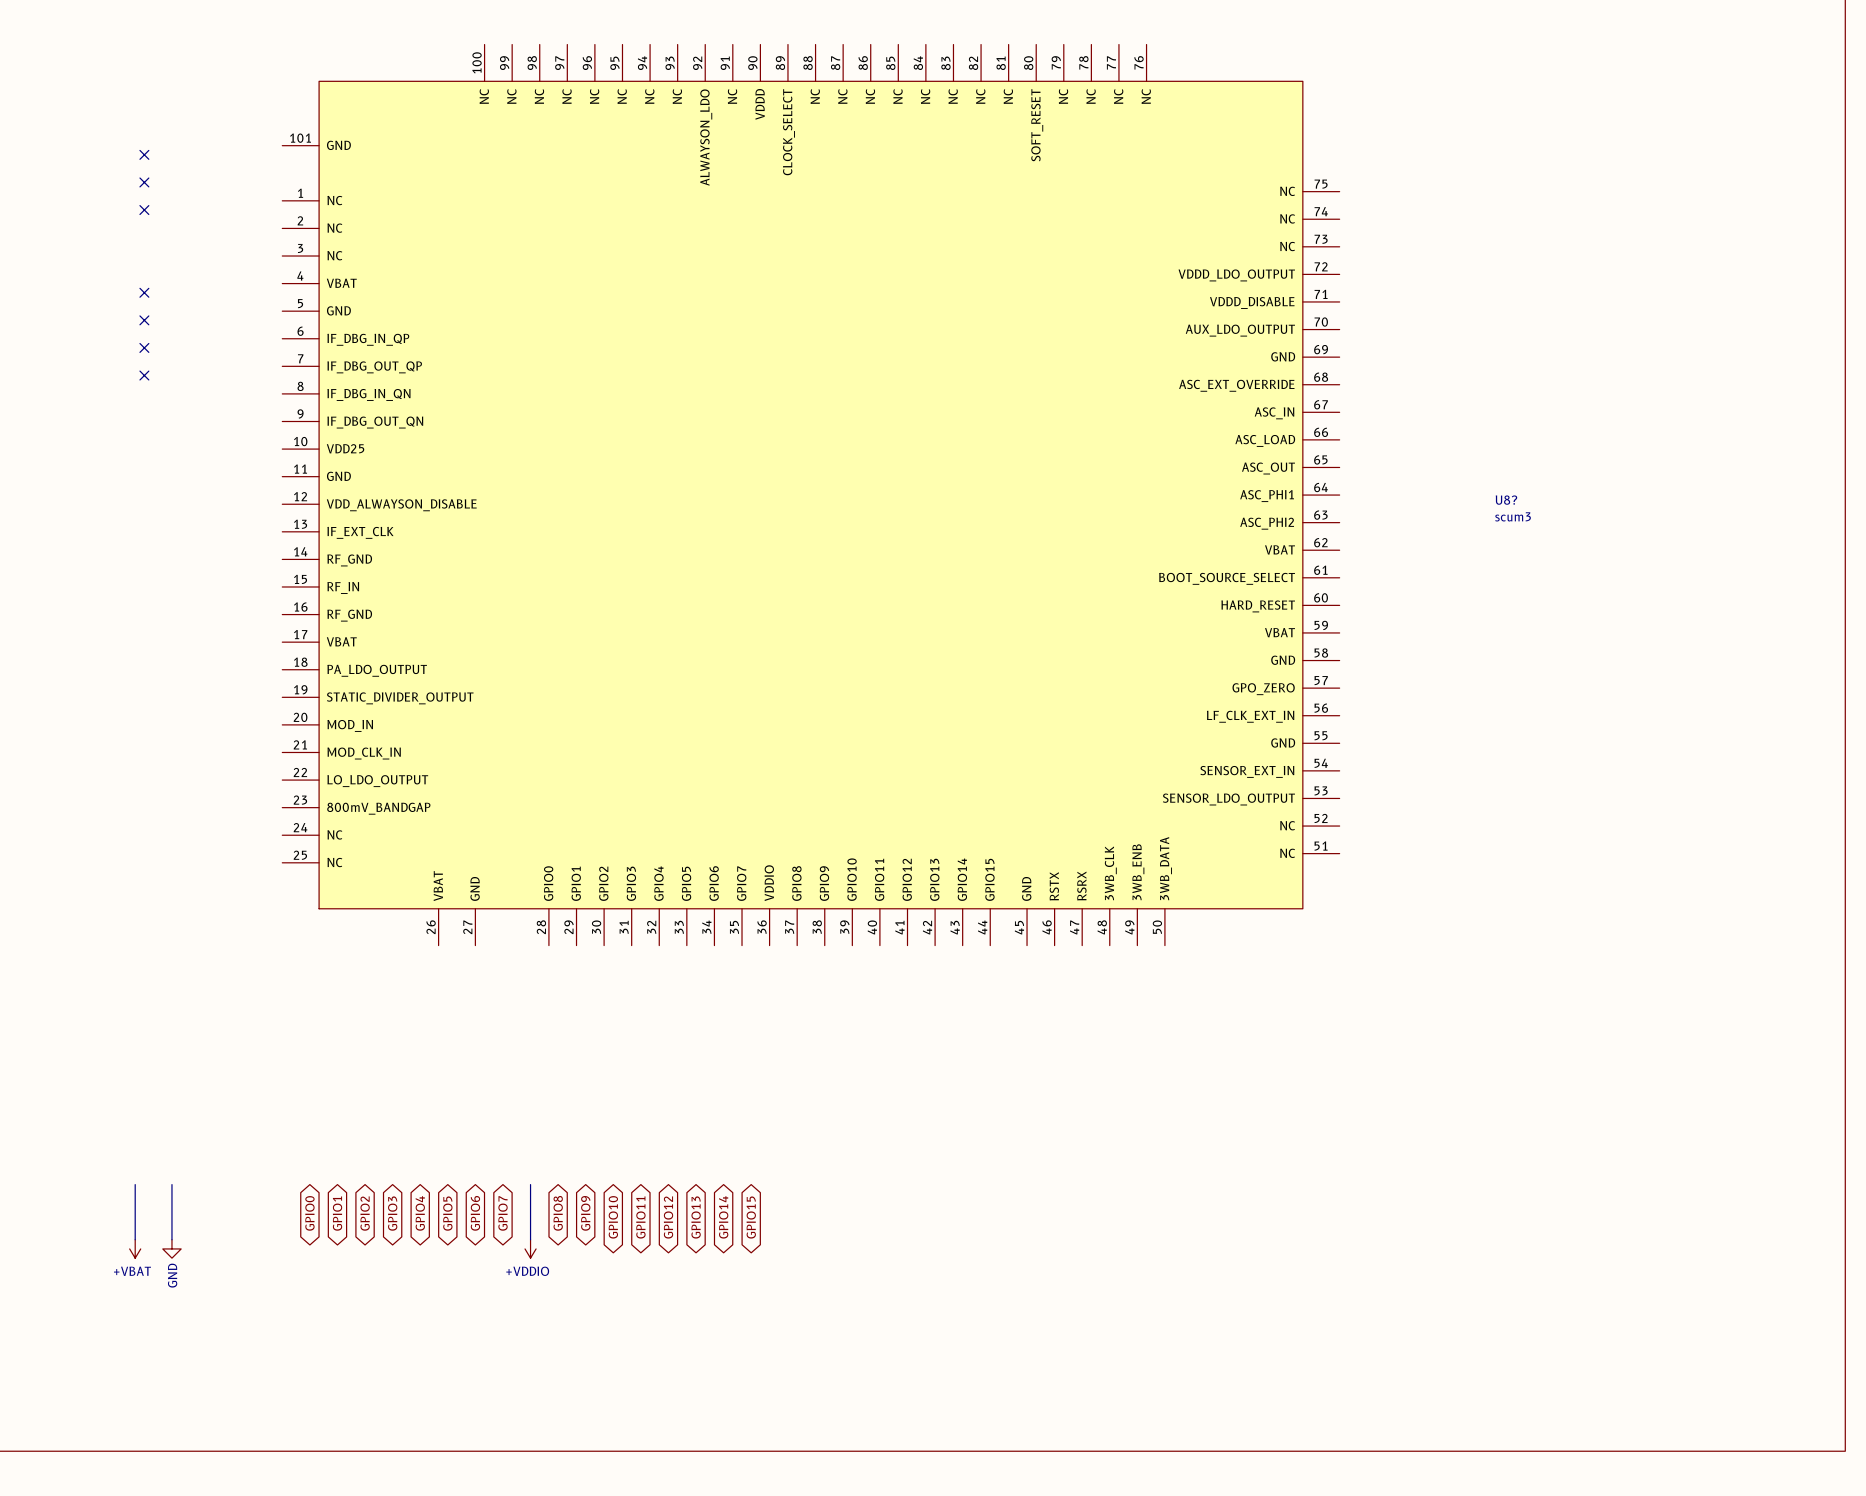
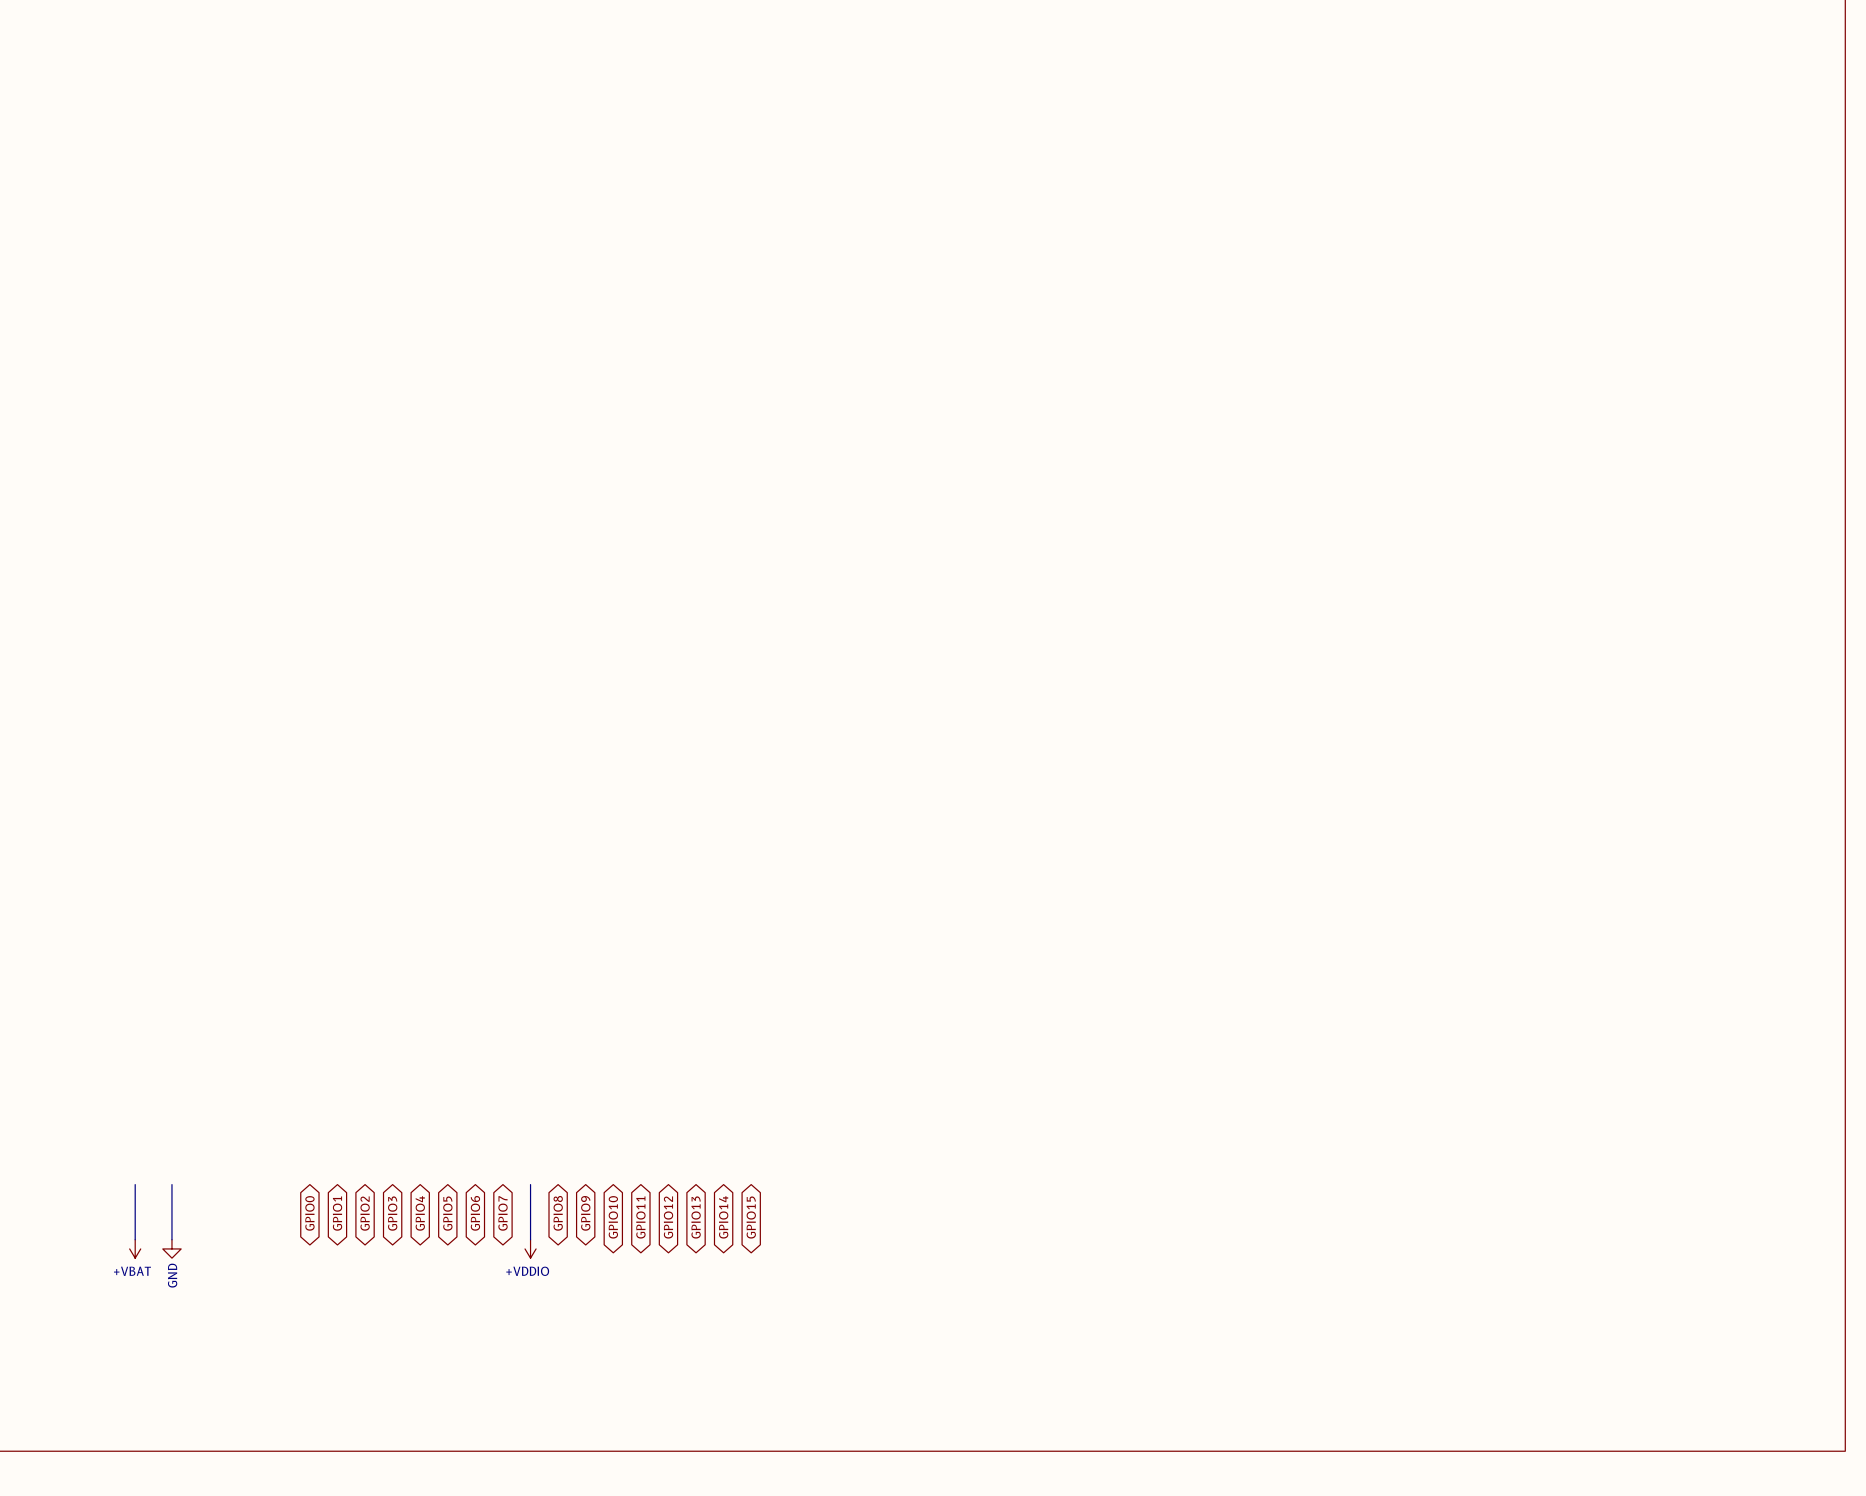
no-connect mark: (144, 154) -> none
no-connect mark: (144, 182) -> none
no-connect mark: (144, 210) -> none
no-connect mark: (144, 292) -> none
no-connect mark: (144, 320) -> none
no-connect mark: (144, 347) -> none
no-connect mark: (144, 375) -> none
U8?: scum3 (810, 495) -> none

